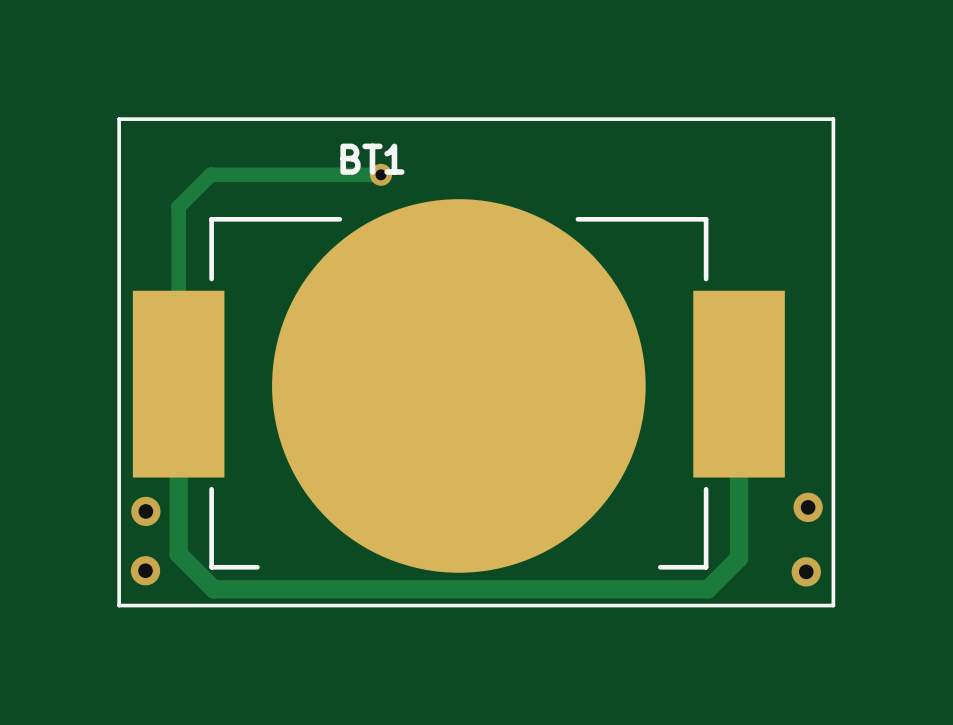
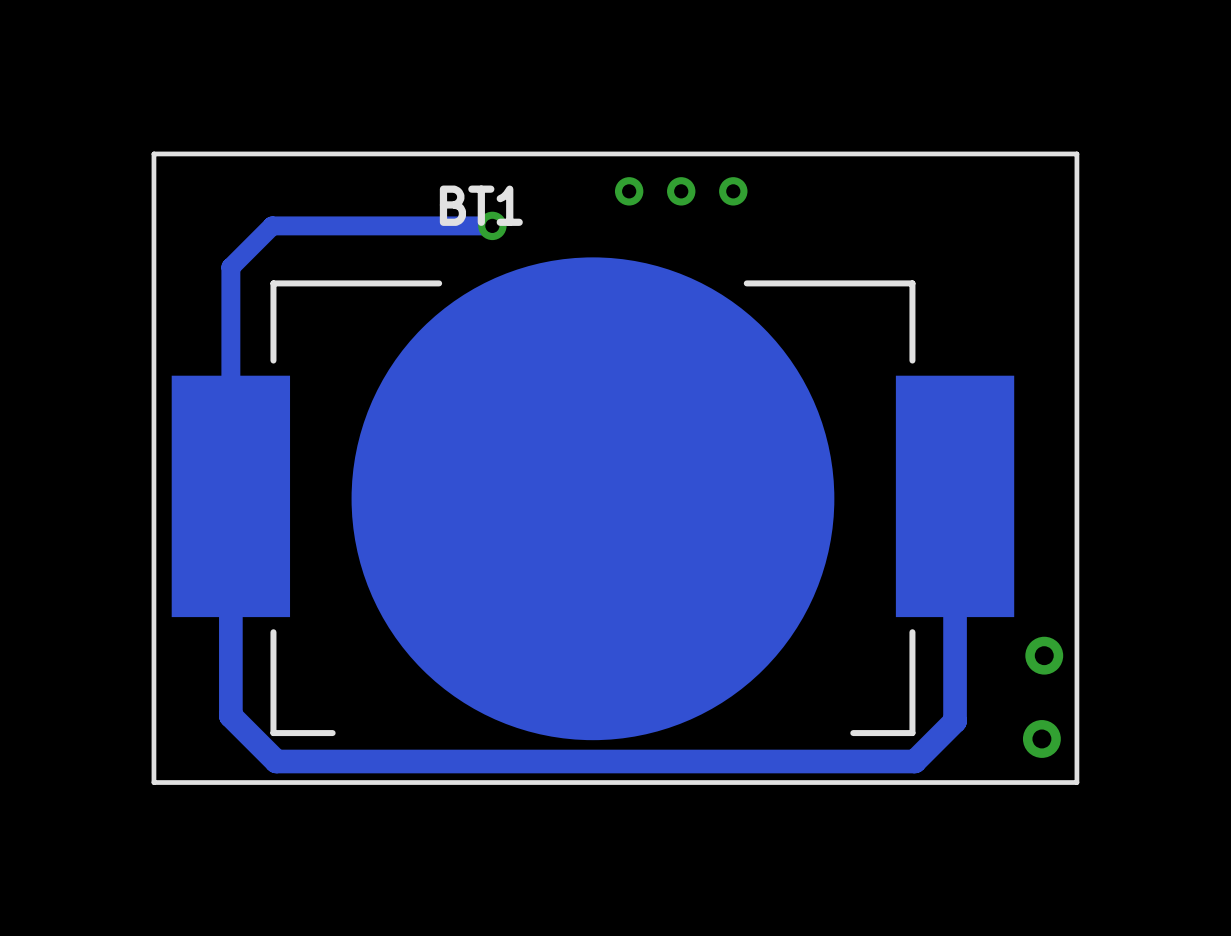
via: none -> (629, 191)
via: none -> (681, 191)
via: none -> (733, 191)
via: (145, 511) -> none
via: (145, 570) -> none

